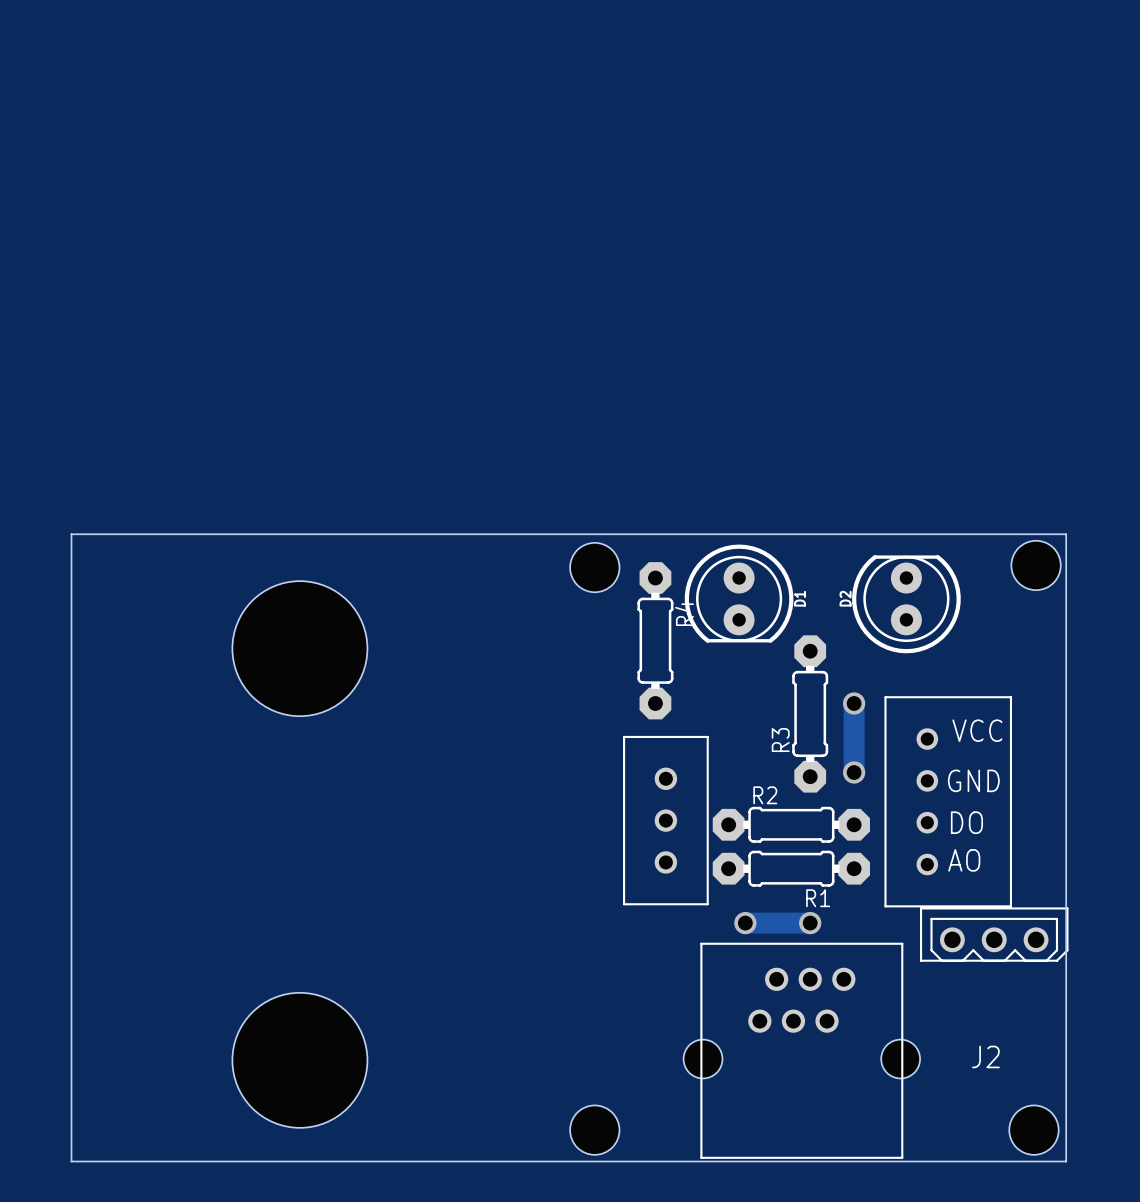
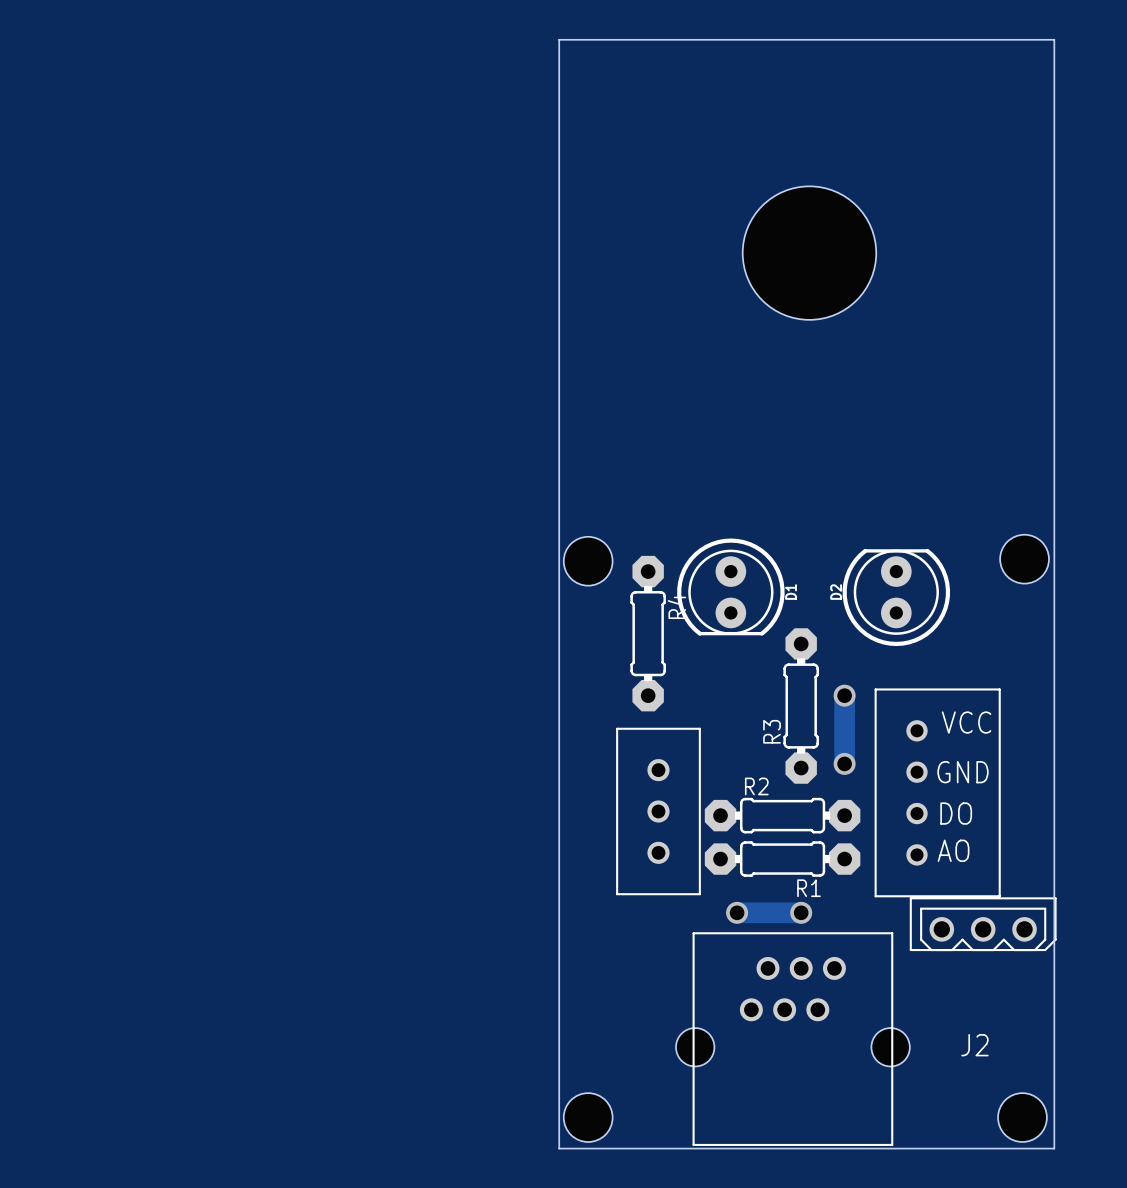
hole: none -> (809, 253)
board edge: (1066, 534) (71, 534) (71, 1161) (565, 1161) -> (1054, 528) (1054, 39) (559, 39) (559, 1148)
hole: (299, 648) -> none
hole: (299, 1060) -> none

